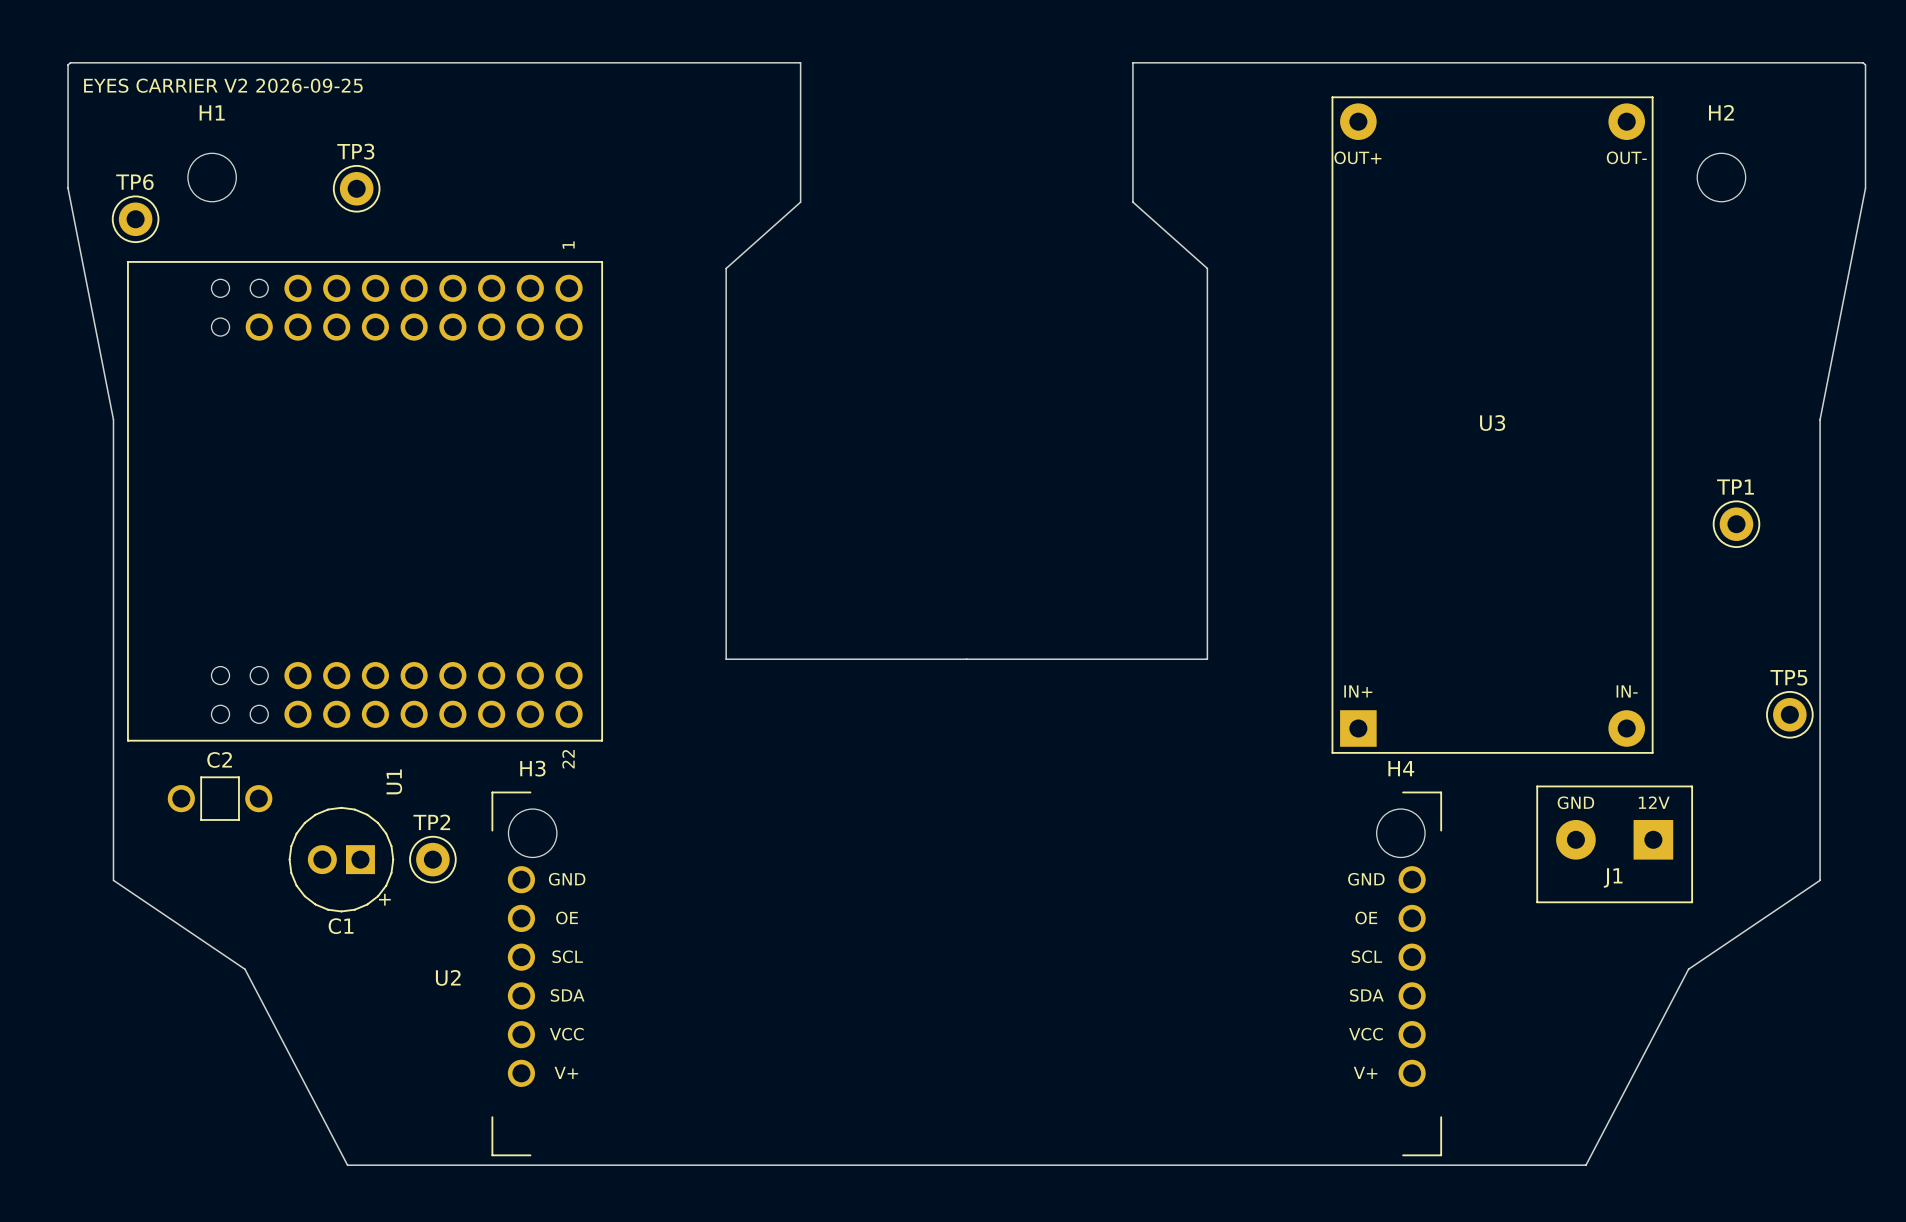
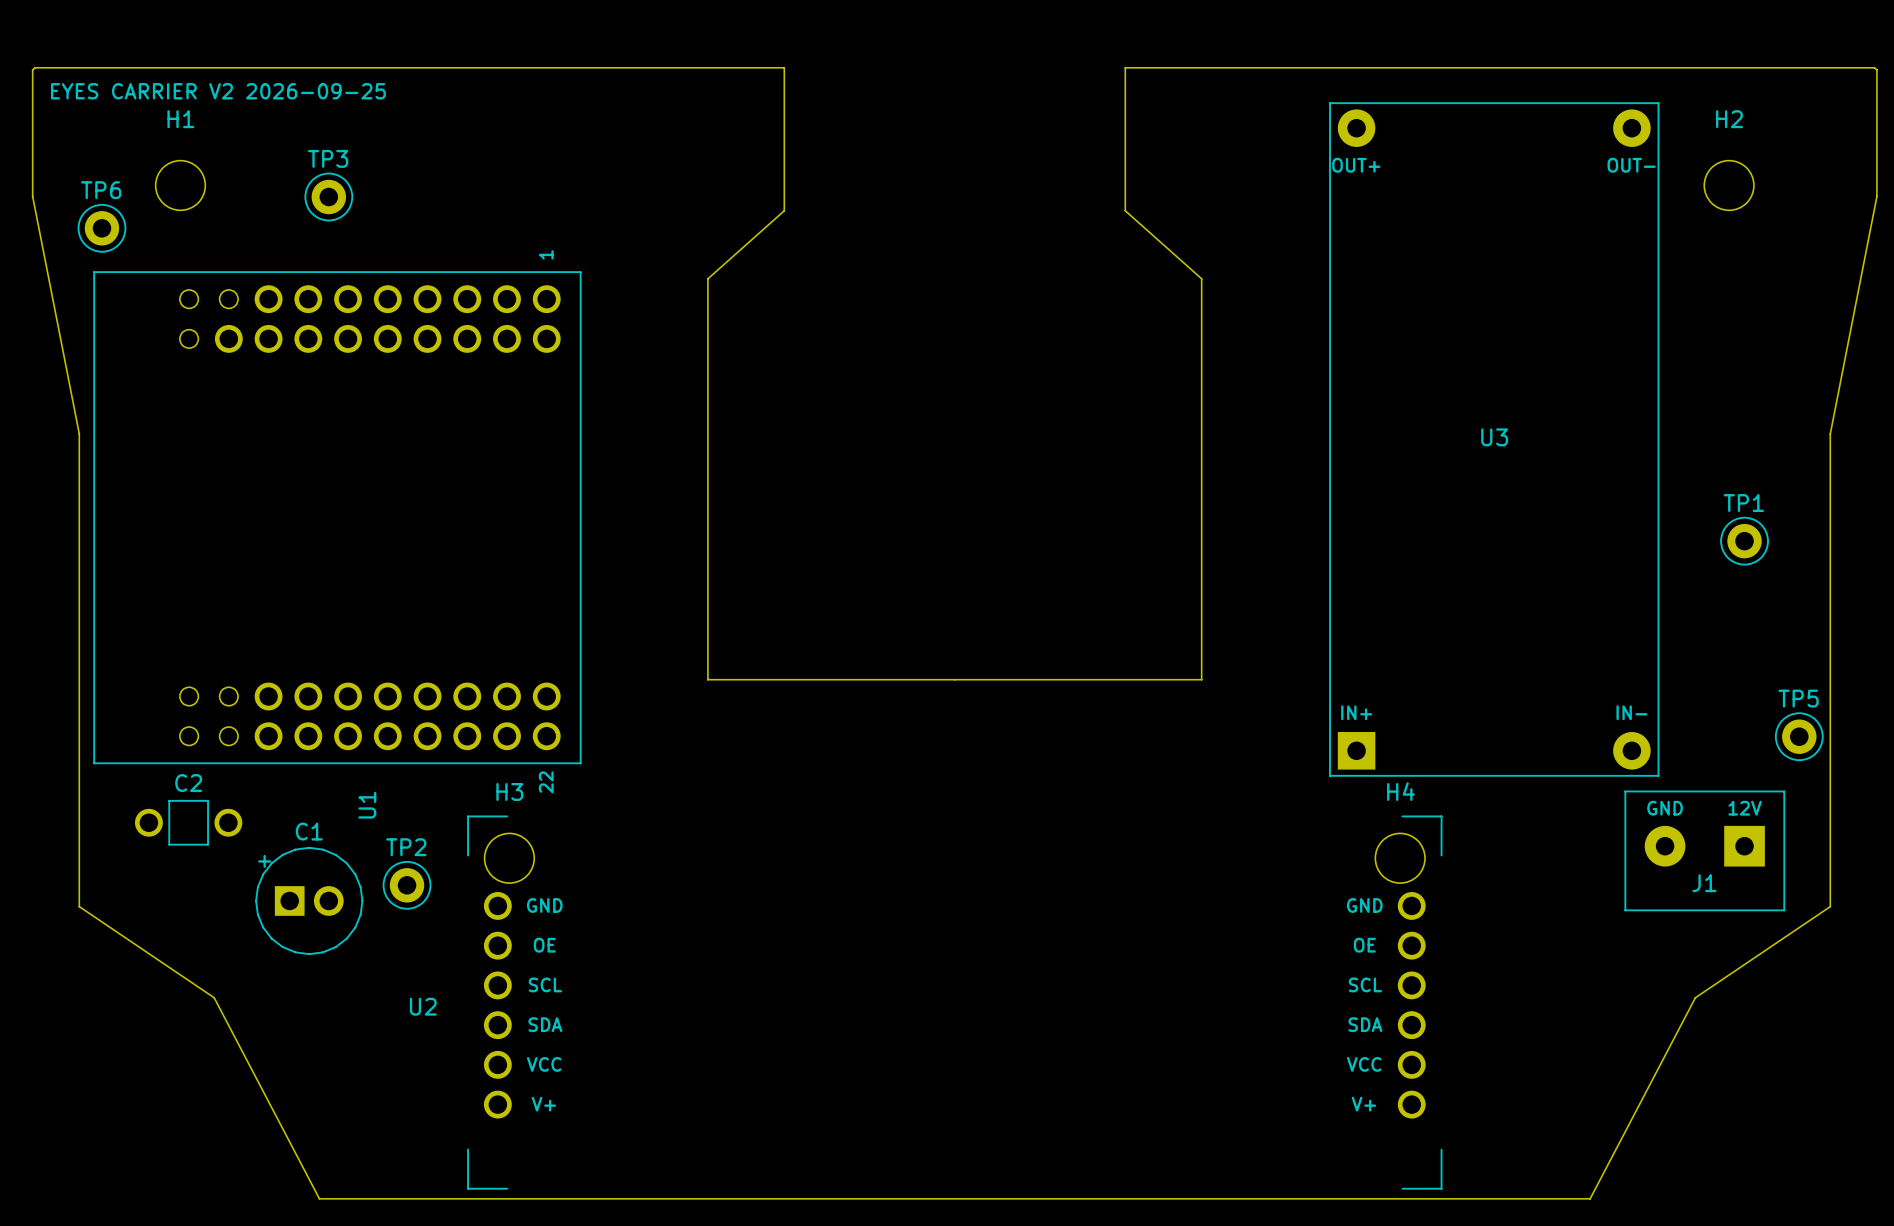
J1 position: (1614, 844) -> (1704, 850)
C1 rotation: 0° (341, 859) -> 180° (309, 900)

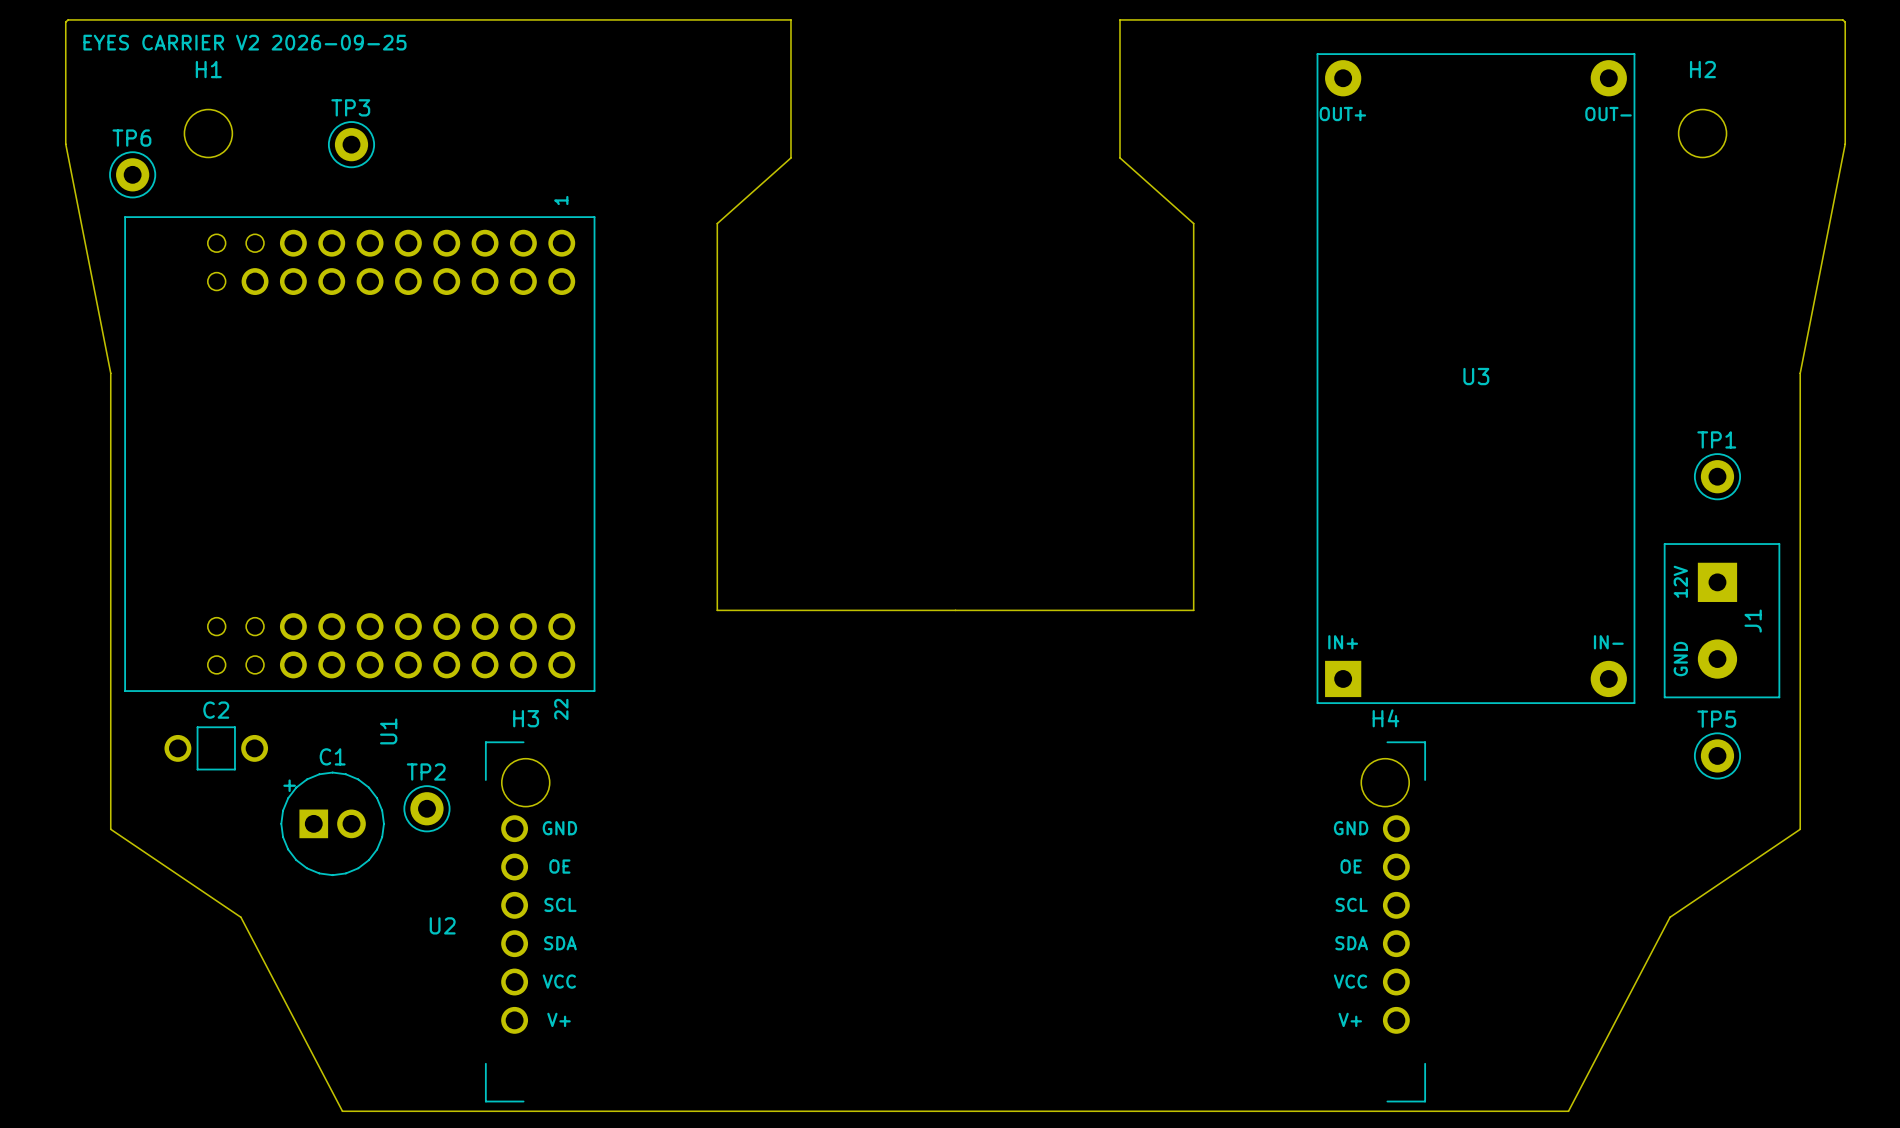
TP5 position: (1799, 736) -> (1717, 755)
J1 rotation: 0° (1704, 850) -> 90° counterclockwise (1722, 620)
J1 position: (1704, 850) -> (1722, 620)

